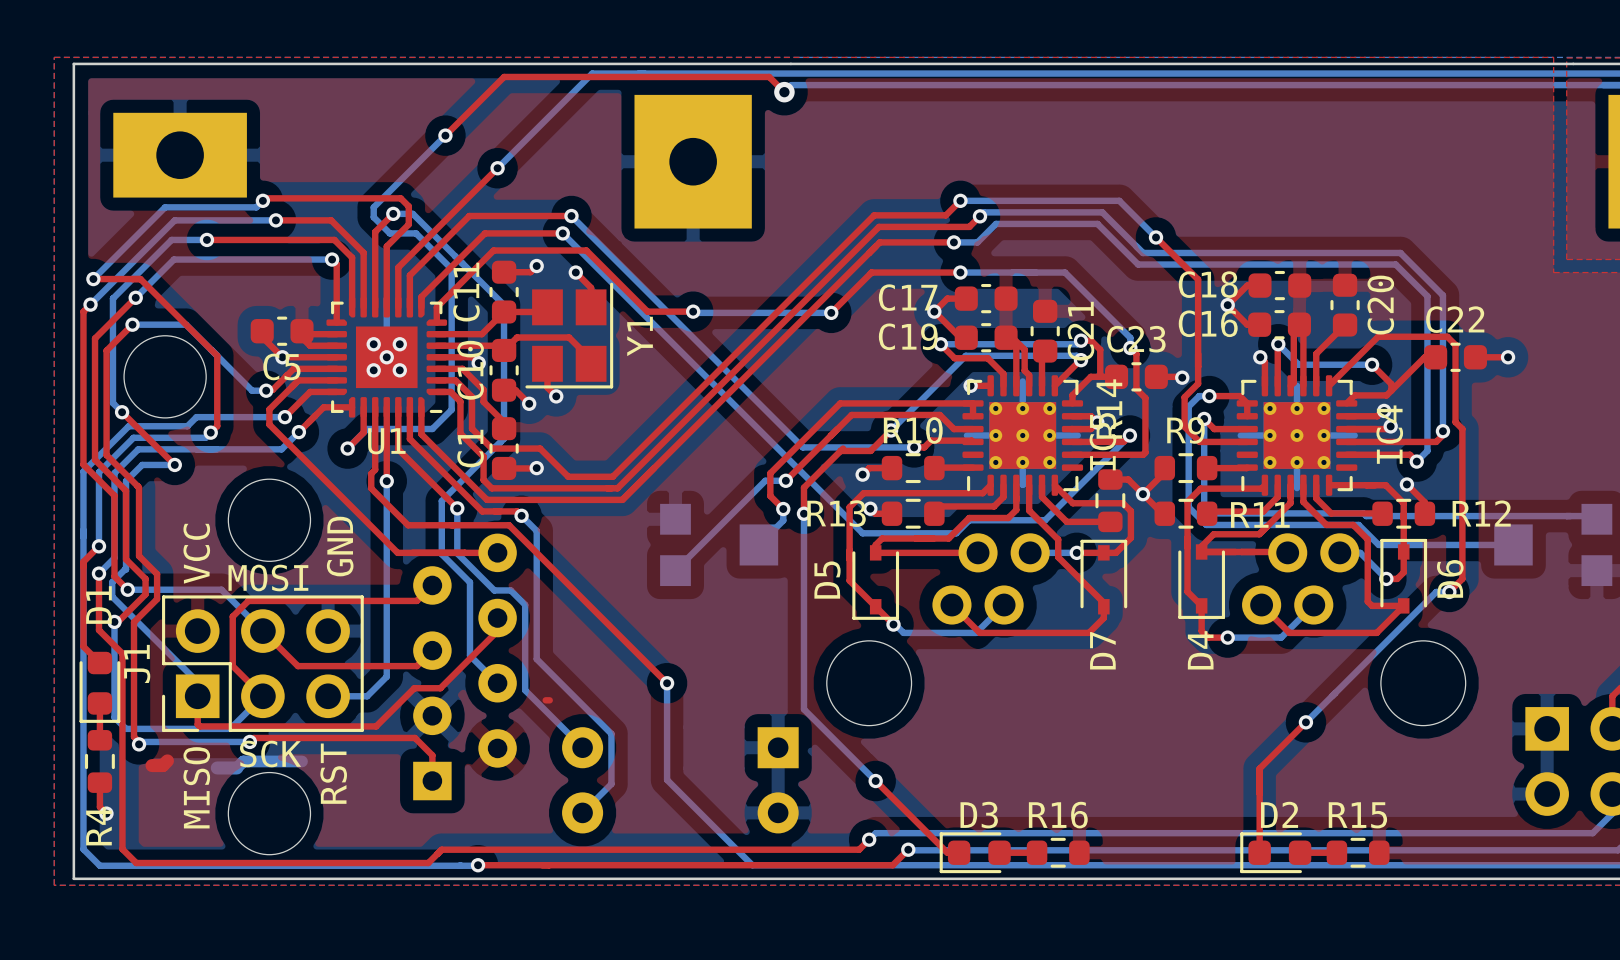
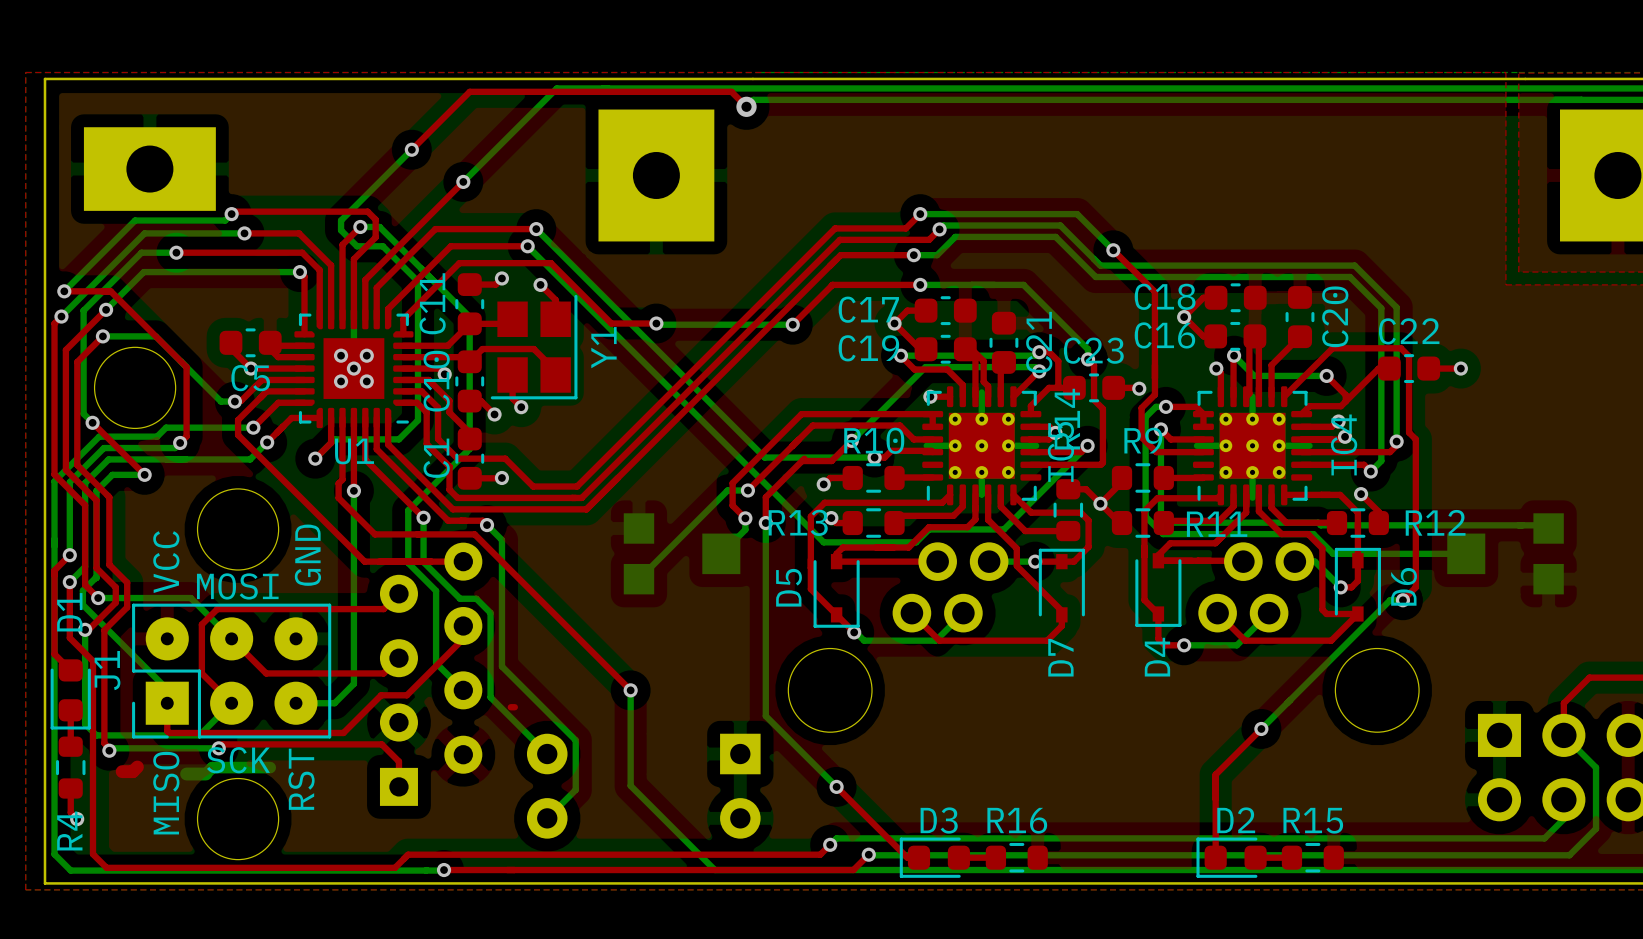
J1 footprint: [162, 595, 364, 732] -> [132, 603, 332, 739]

